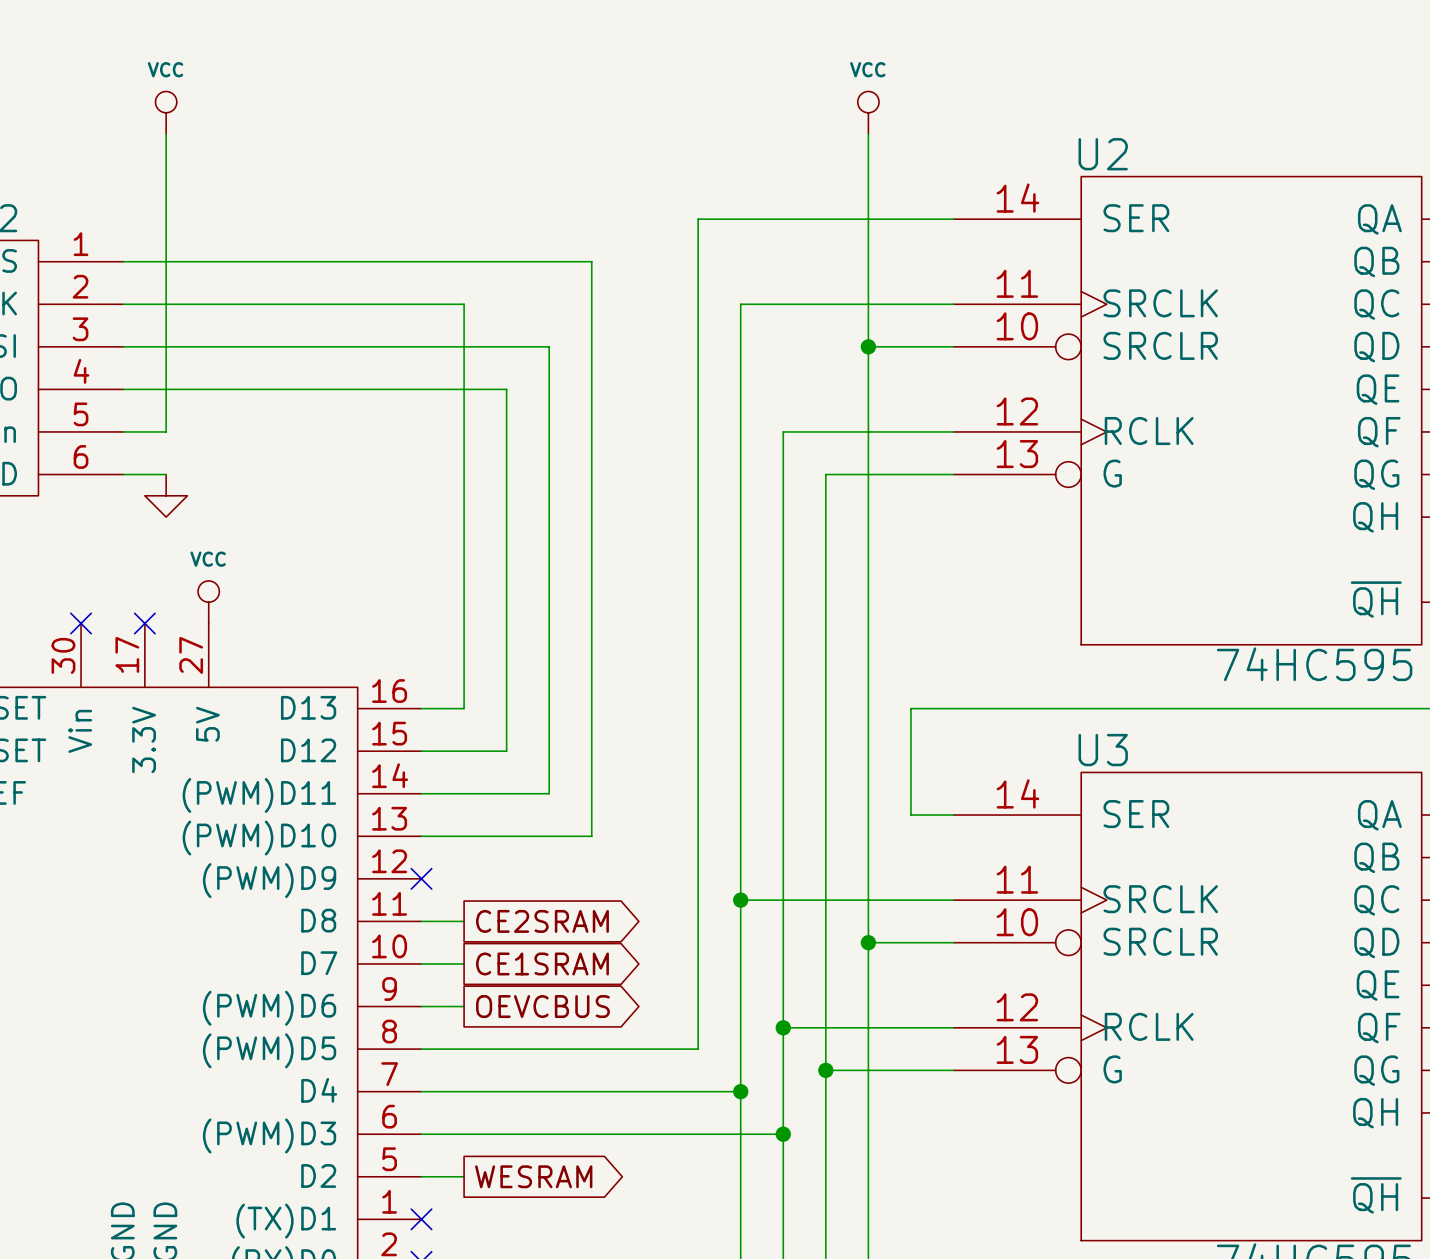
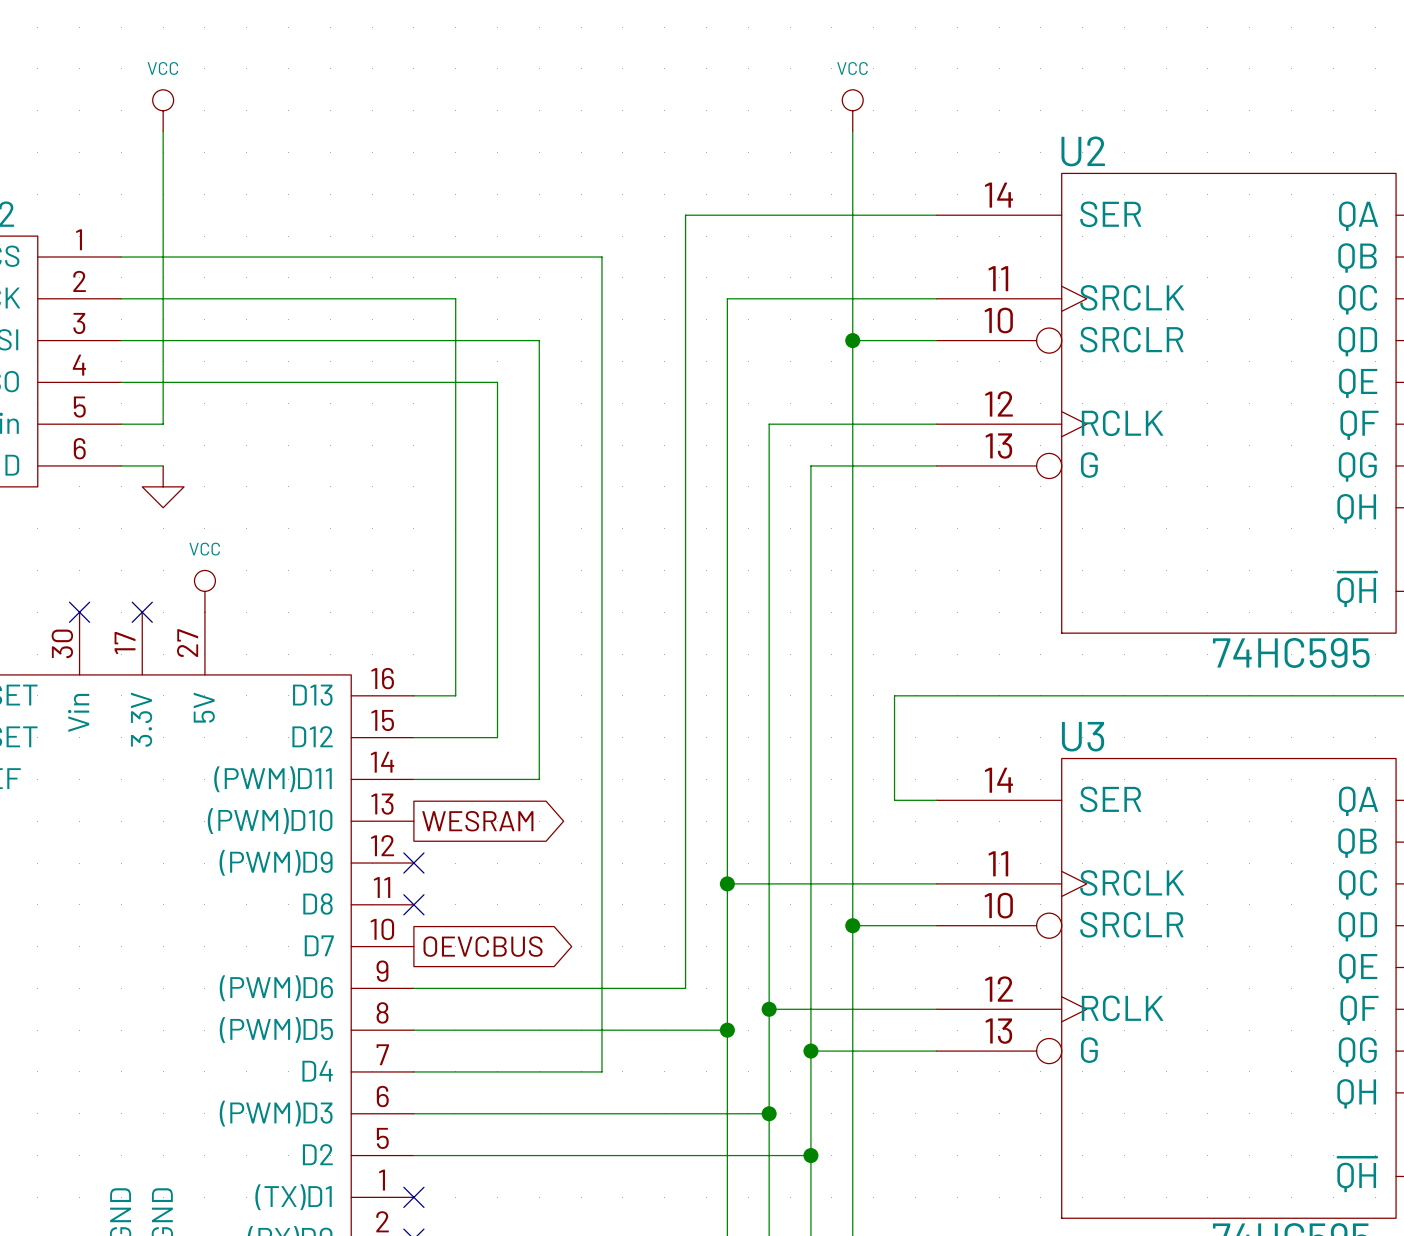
wire: (591, 261) (591, 836) (421, 836) -> (581, 257) (601, 257) (601, 1071)
wire: (421, 921) (464, 921) -> none
no-connect mark: none -> (413, 904)
global label: CE2SRAM (542, 921) -> none
wire: (421, 963) (464, 963) -> none
global label: CE1SRAM (542, 963) -> none
wire: none -> (455, 988) (685, 988)
global label position: OEVCBUS (542, 1006) -> OEVCBUS (483, 946)
wire: (698, 1006) (698, 1049) -> (727, 1030) (685, 1030)
wire: (613, 1091) (740, 1091) -> none
junction position: (740, 1091) -> (727, 1030)
wire: none -> (455, 1155) (810, 1155)
global label position: WESRAM (533, 1176) -> WESRAM (477, 821)
junction: none -> (810, 1155)

